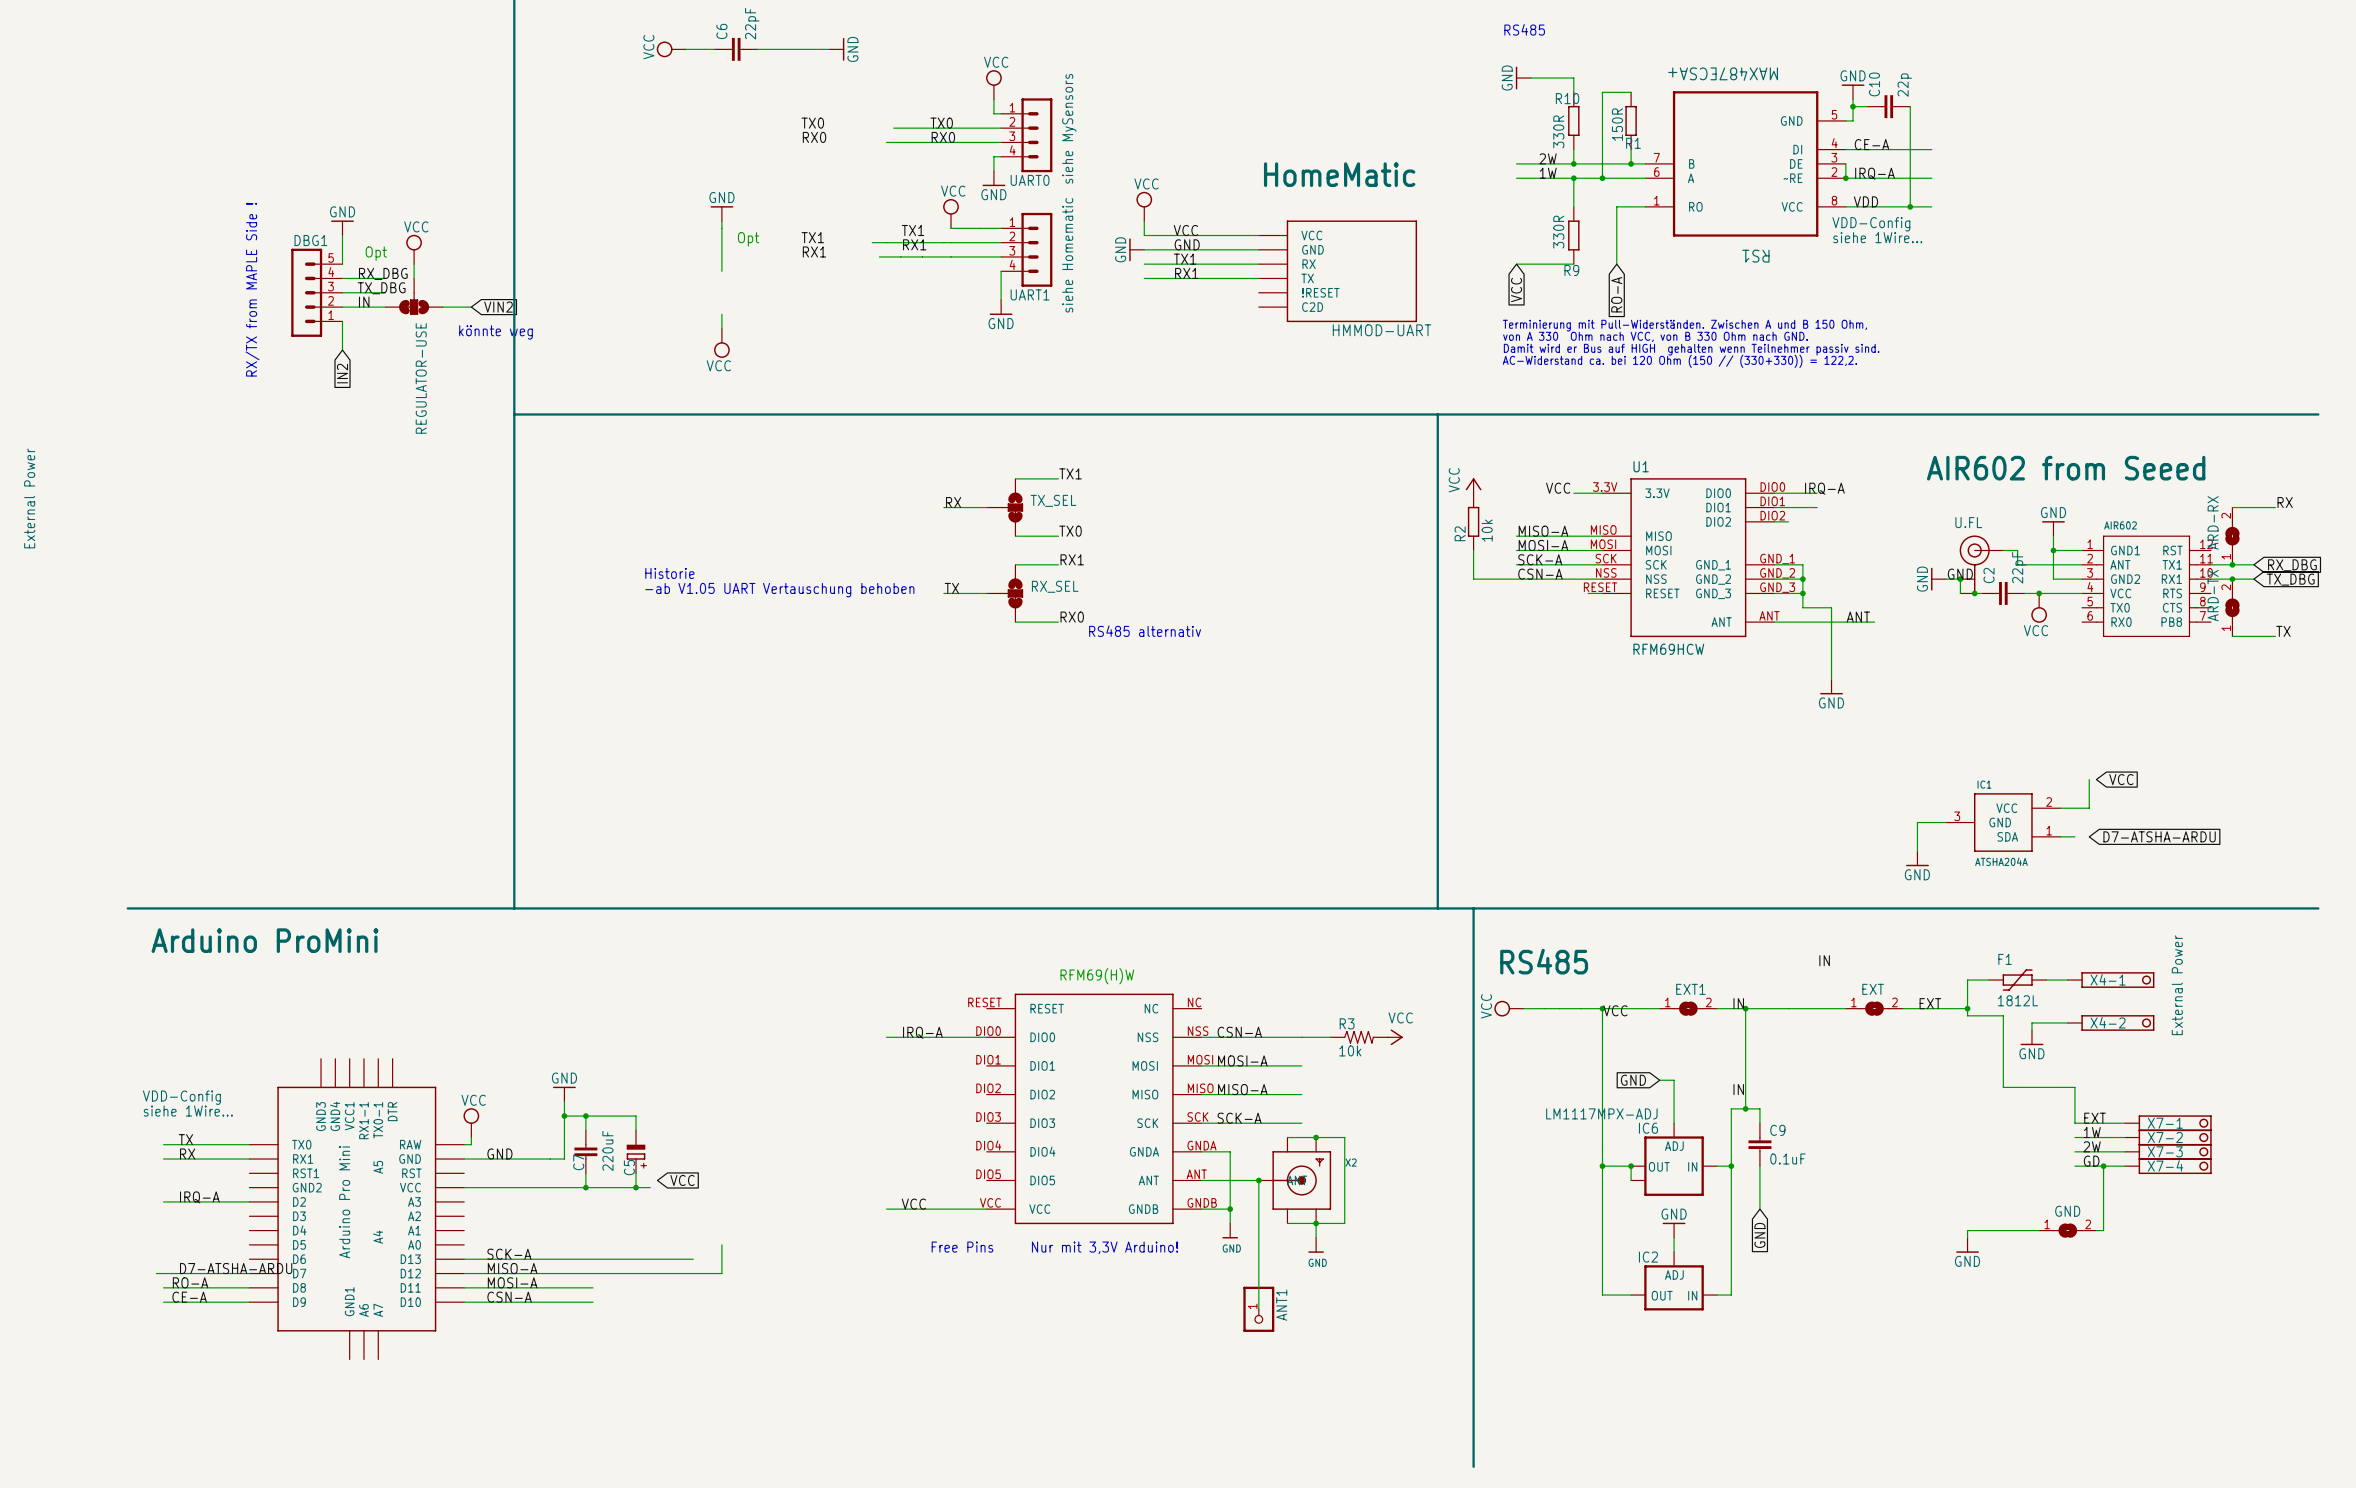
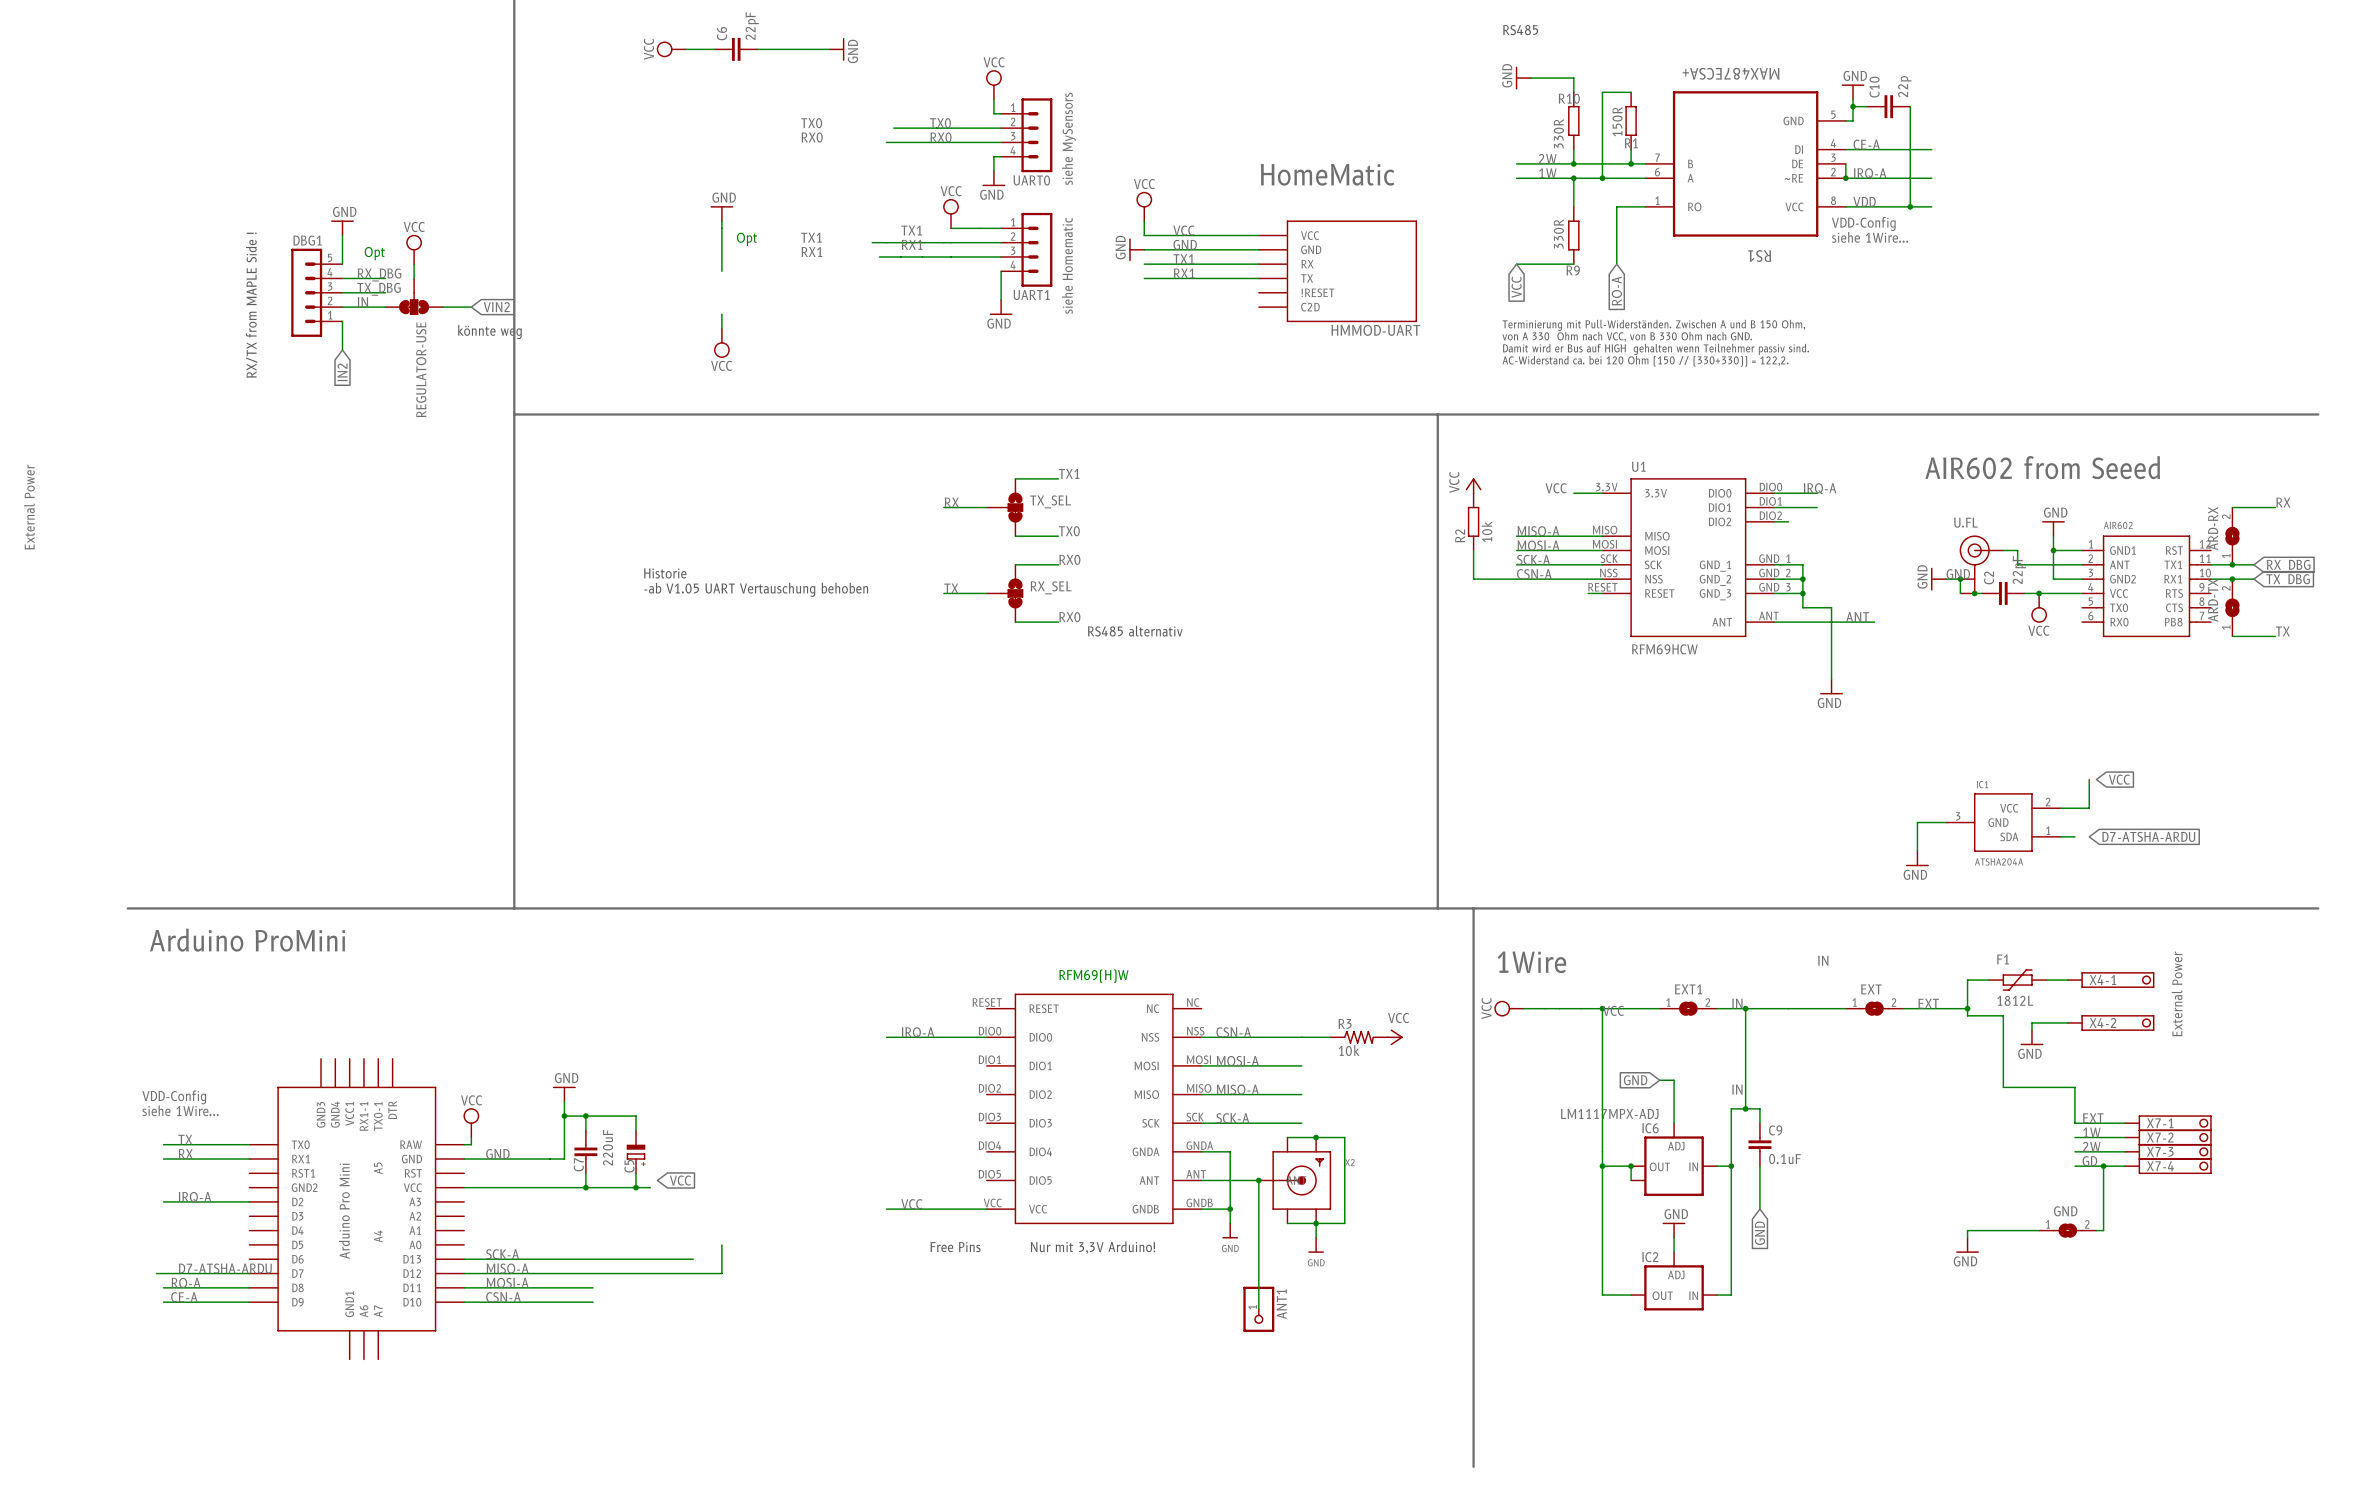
label: RX1 (1072, 559) -> RX0 (1069, 559)
text: RS485 (1544, 961) -> 1Wire (1531, 962)

